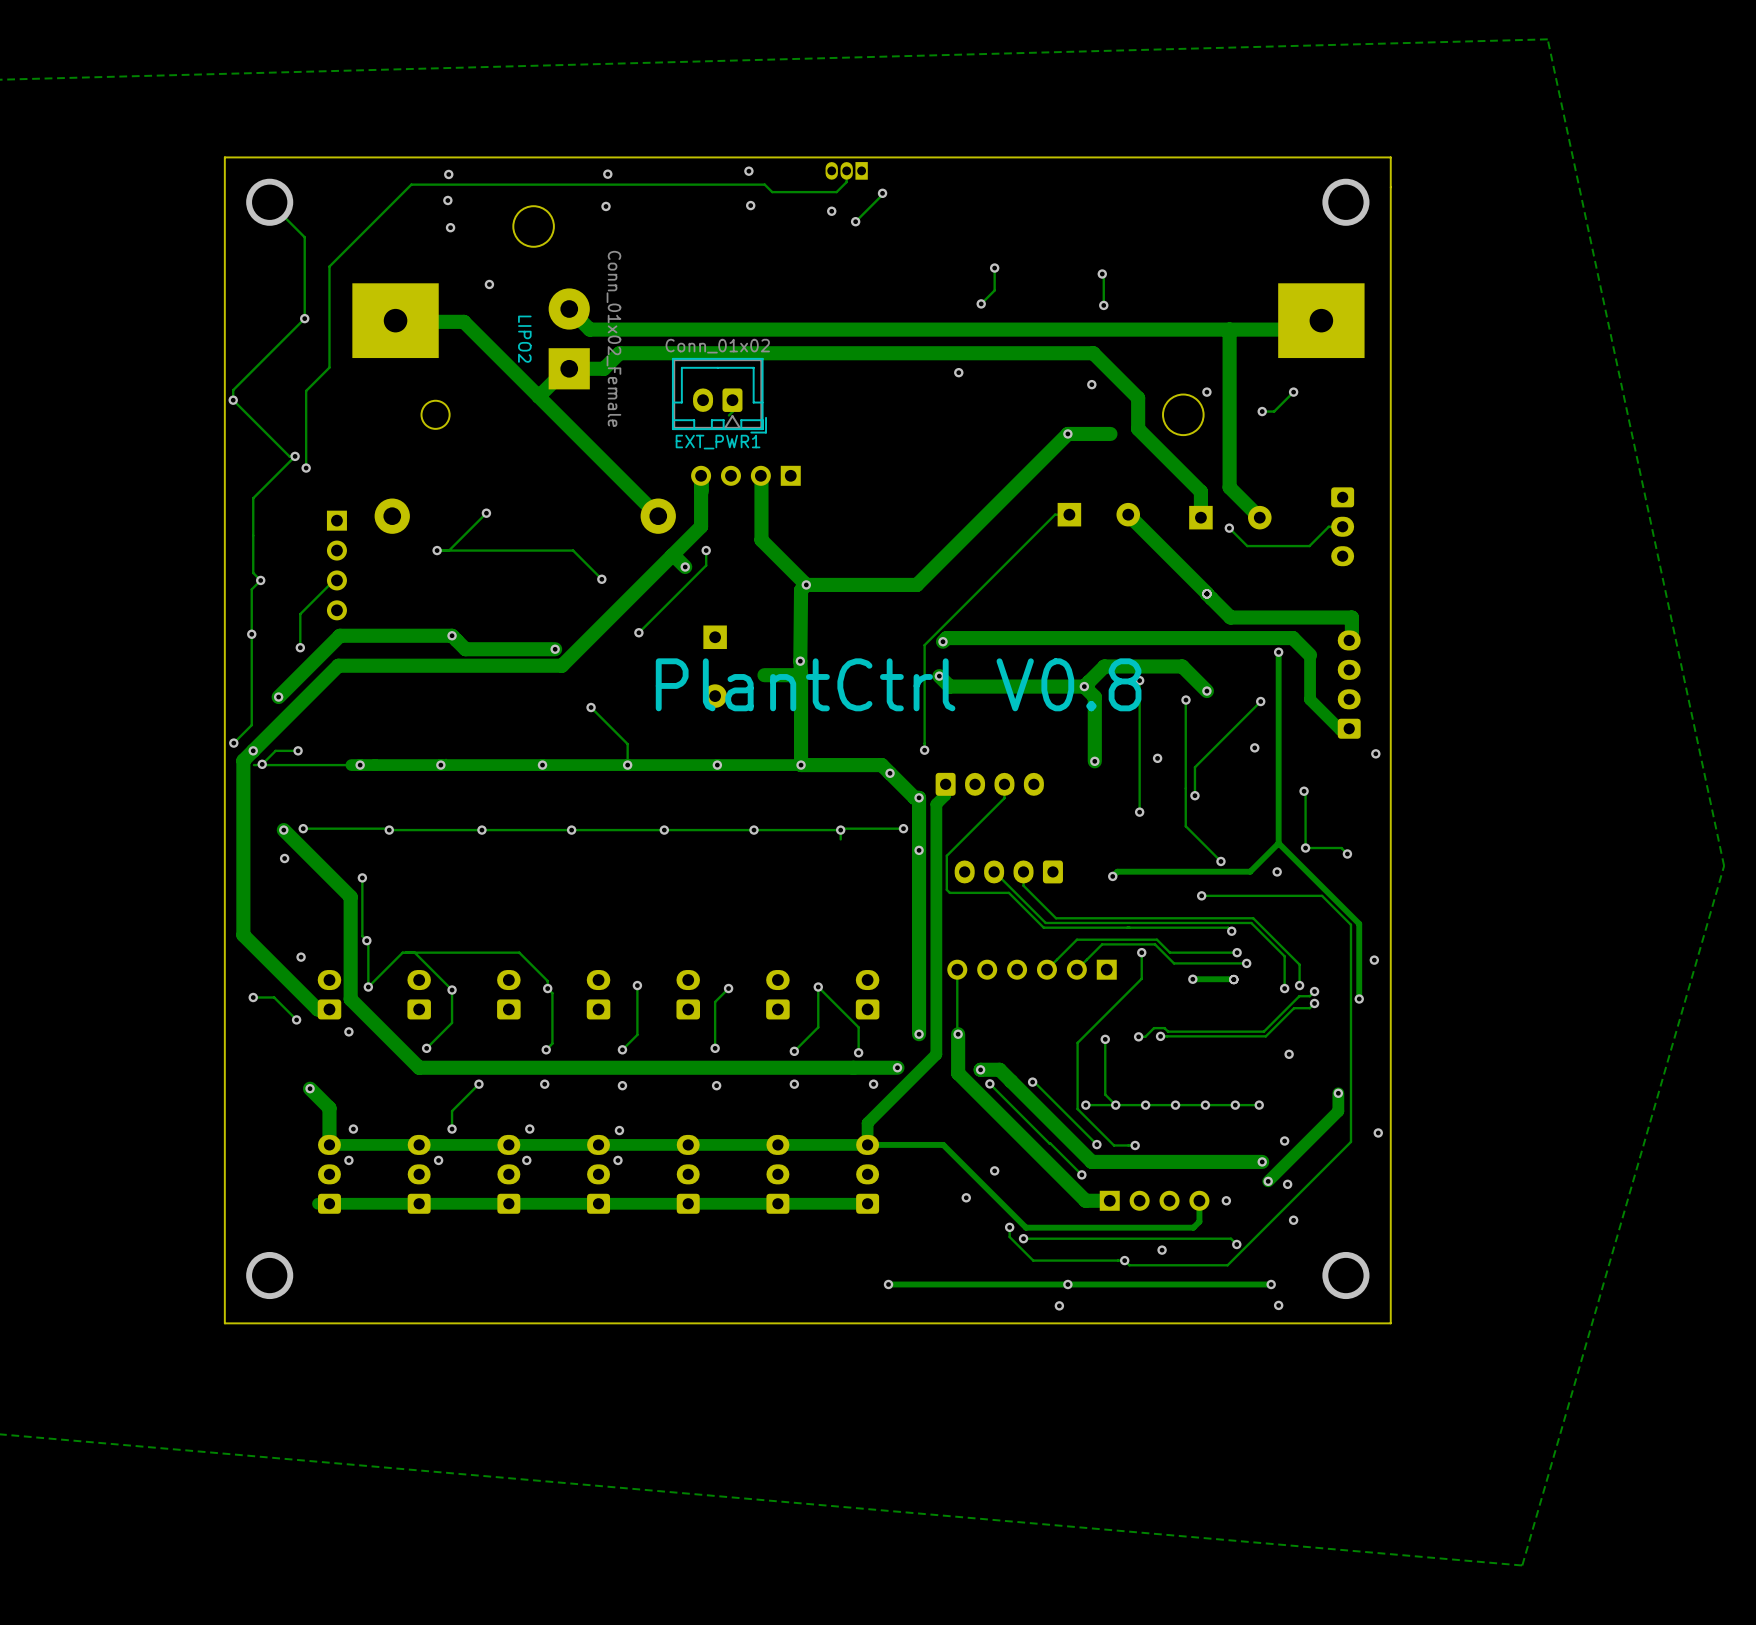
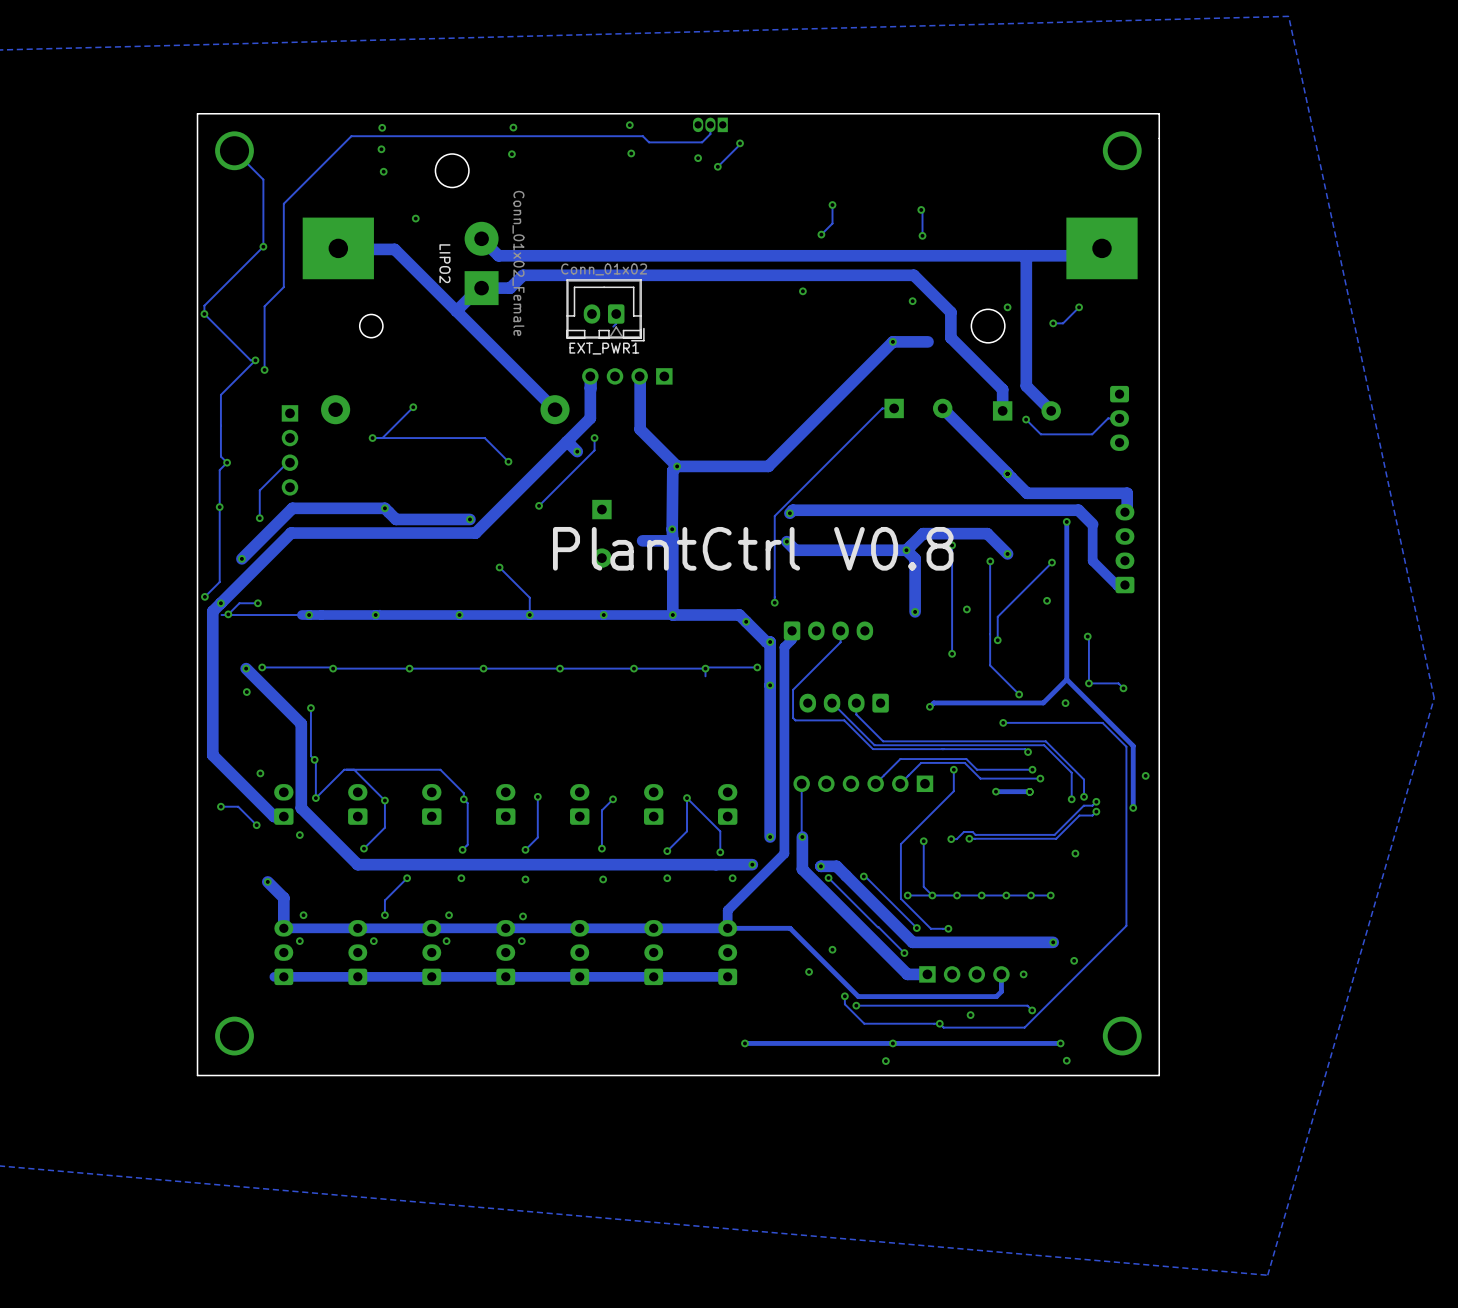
via: (1375, 753) -> none
track: (1338, 1093) (1338, 1111) (1268, 1181) -> none
via: (1338, 1093) -> none
via: (1378, 1132) -> none
via: (1284, 1140) -> none
via: (1268, 1181) -> none
via: (1293, 1220) -> none

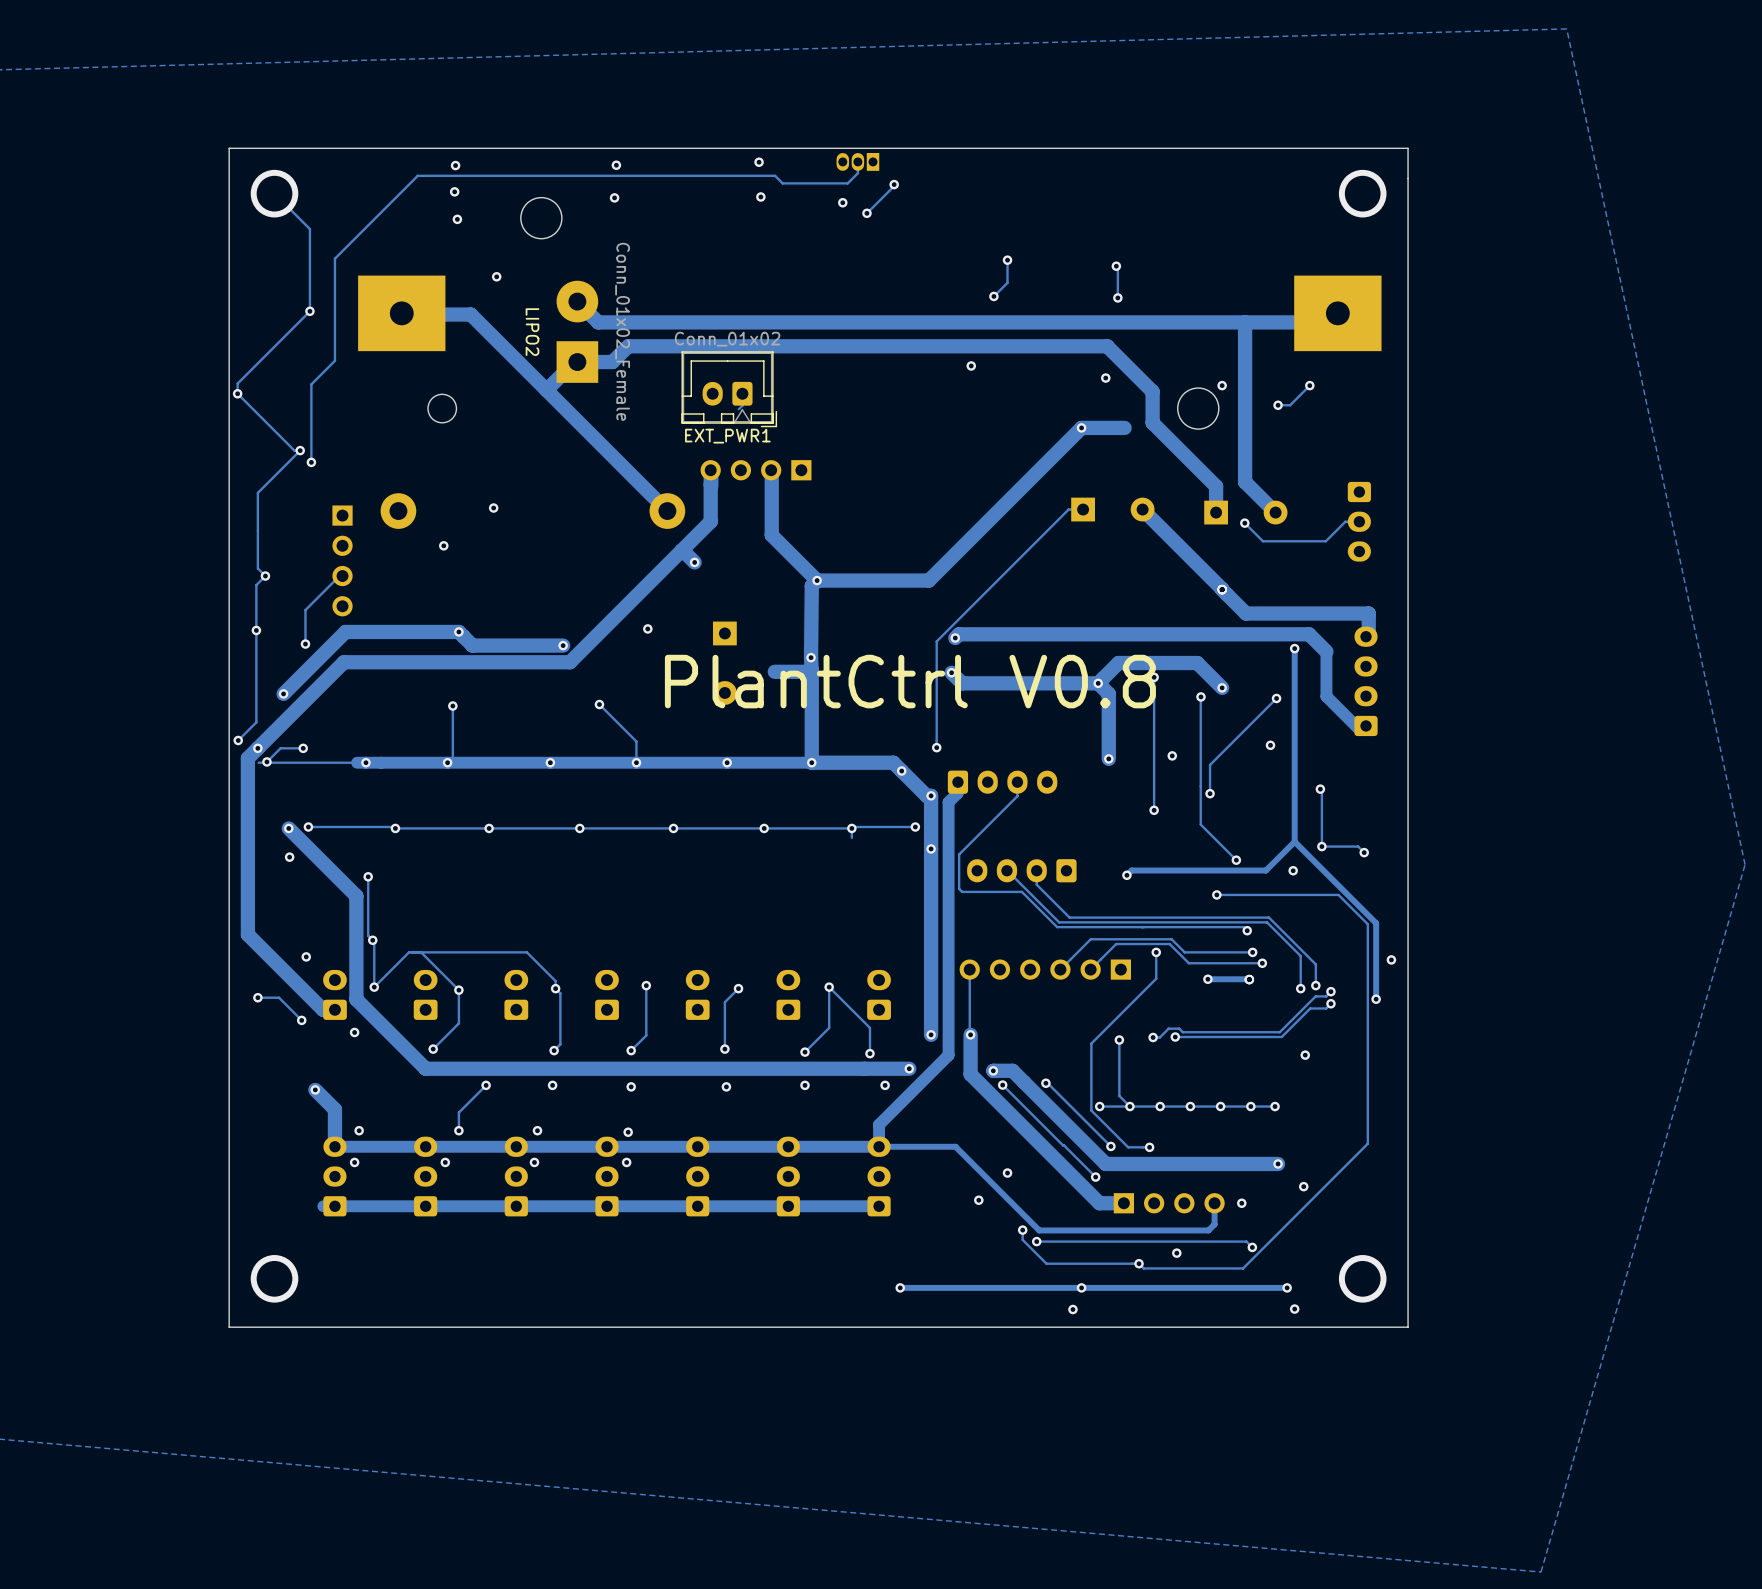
track: (413, 407) (382, 438) -> none
track: (372, 438) (484, 438) (508, 461) -> none
track: (594, 438) (594, 450) (539, 505) -> none
via: (594, 438) -> none
via: (508, 461) -> none
track: none -> (452, 706) (452, 757)
via: none -> (452, 706)

